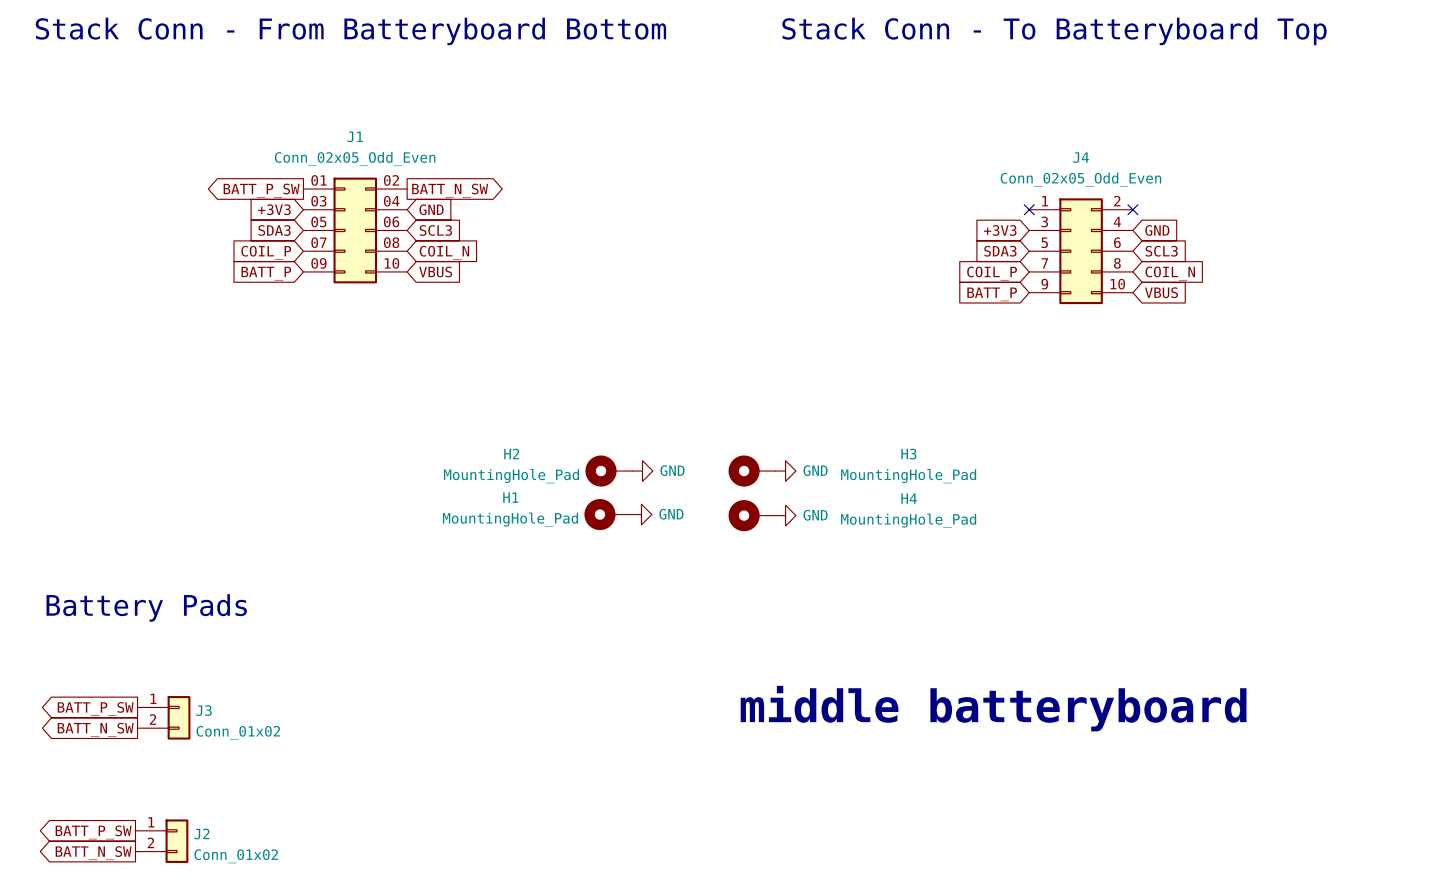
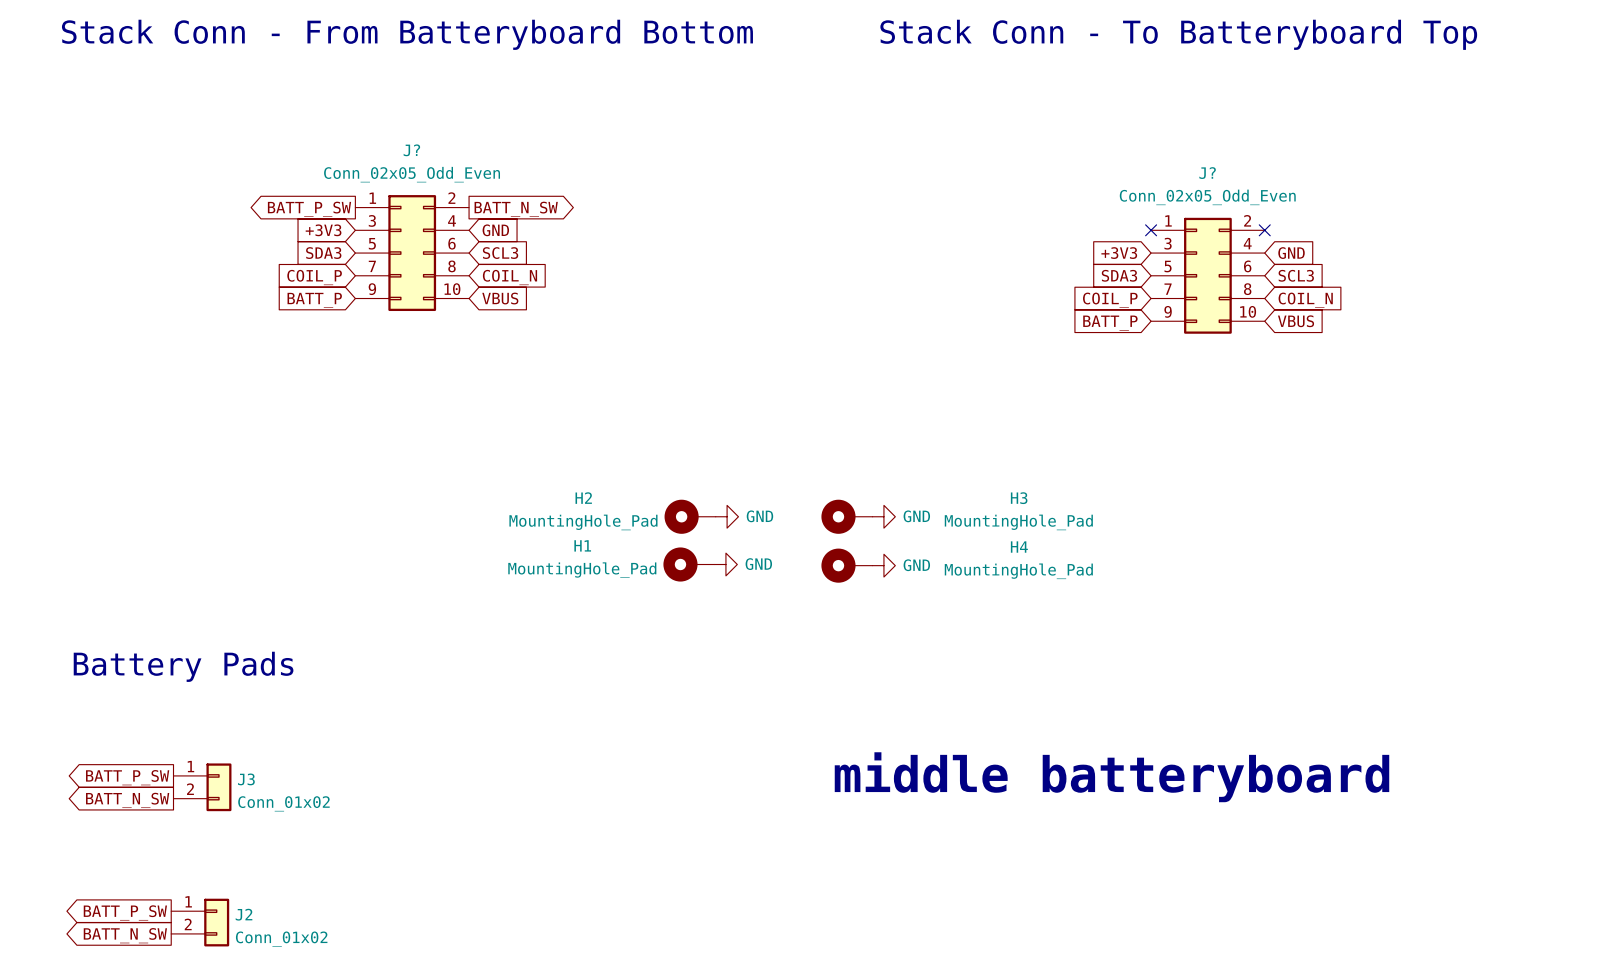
J1 name: J1 (355, 136) -> J? (411, 150)
J4 name: J4 (1081, 157) -> J? (1207, 173)
J1 symbol: [303, 177, 408, 284] -> [355, 195, 470, 312]

